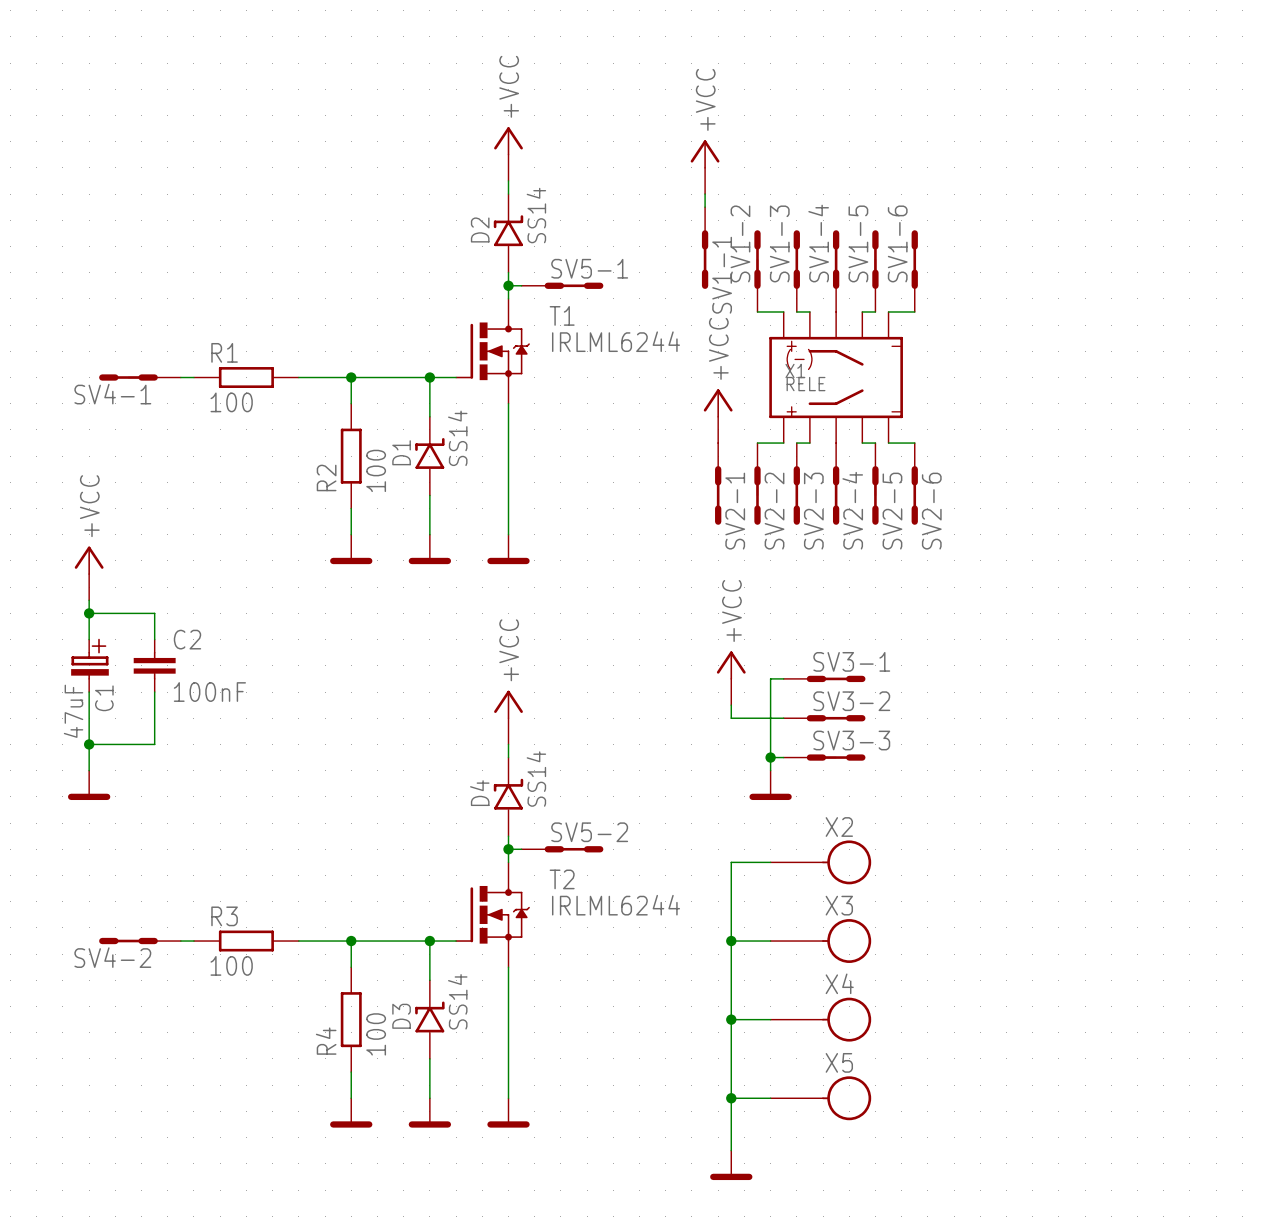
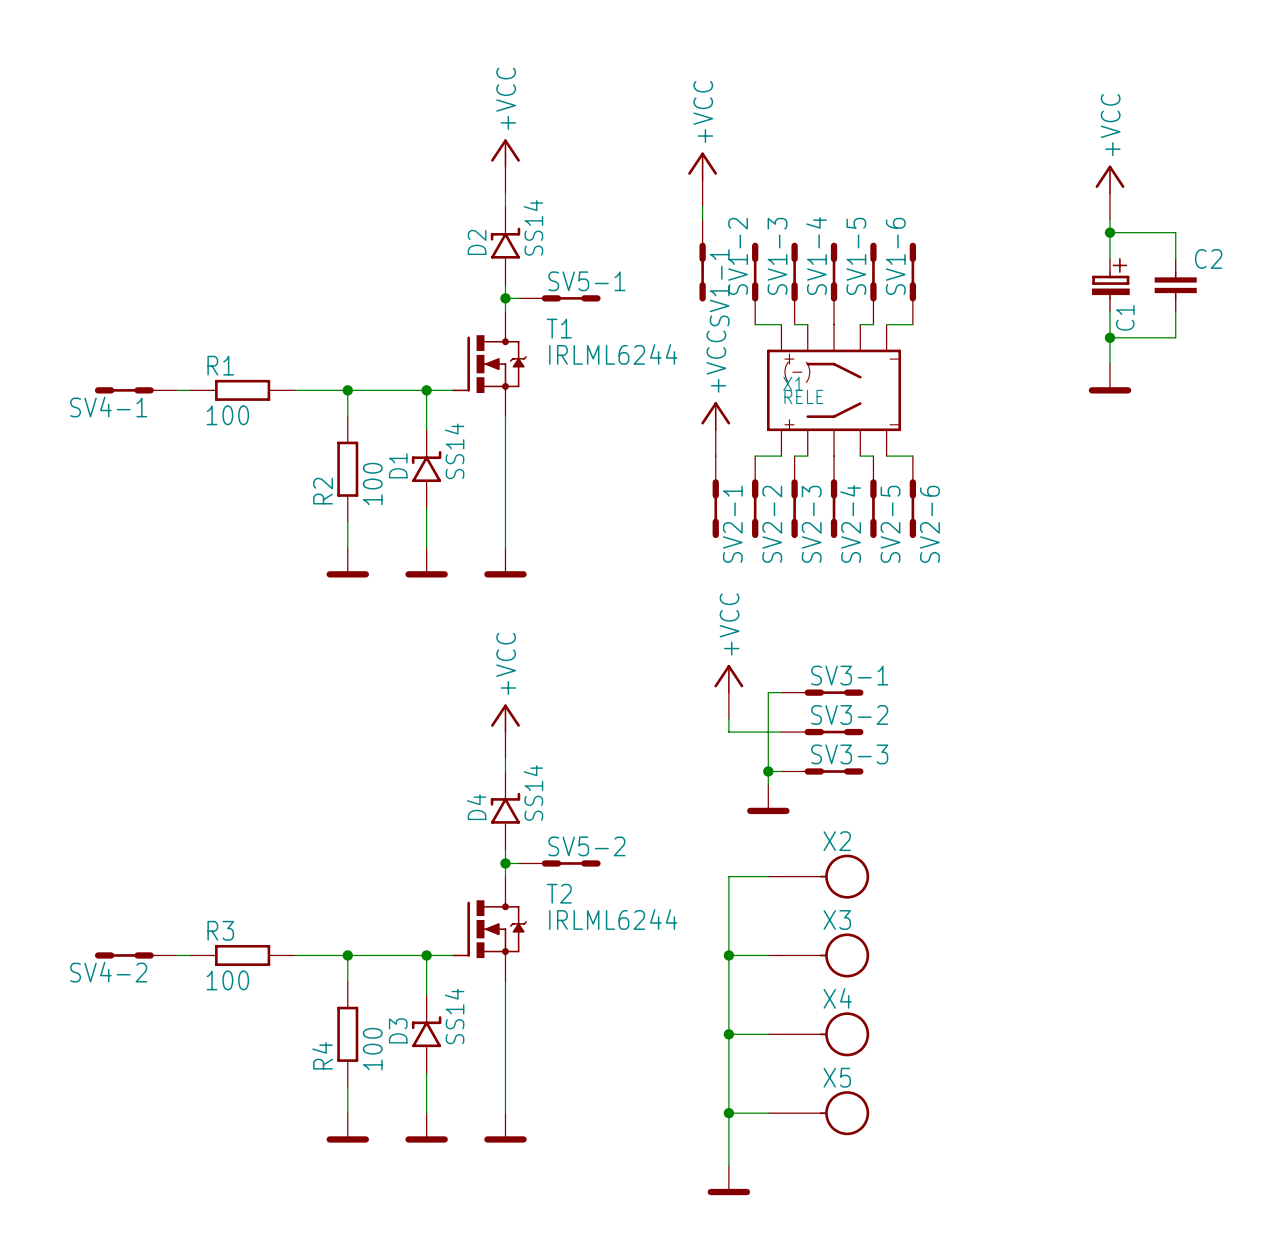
power symbol: none -> +VCC (1110, 192)
wire: none -> (1110, 219) (1110, 258)
wire: none -> (1110, 232) (1175, 232) (1175, 258)
junction: none -> (1110, 232)
wire: none -> (1110, 311) (1110, 364)
wire: none -> (1175, 311) (1175, 337) (1110, 337)
junction: none -> (1110, 337)
power symbol: none -> (1110, 378)
power symbol: +VCC (89, 573) -> none
wire: (89, 600) (89, 639) -> none
wire: (89, 613) (154, 613) (154, 639) -> none
junction: (89, 613) -> none
C1 position: (89, 665) -> (1110, 285)
C2 position: (154, 665) -> (1175, 285)
wire: (89, 692) (89, 770) -> none
wire: (154, 692) (154, 744) (89, 744) -> none
C2 value: 100nF (209, 692) -> none
C1 value: 47uF (73, 711) -> none
junction: (89, 744) -> none
power symbol: (89, 785) -> none

